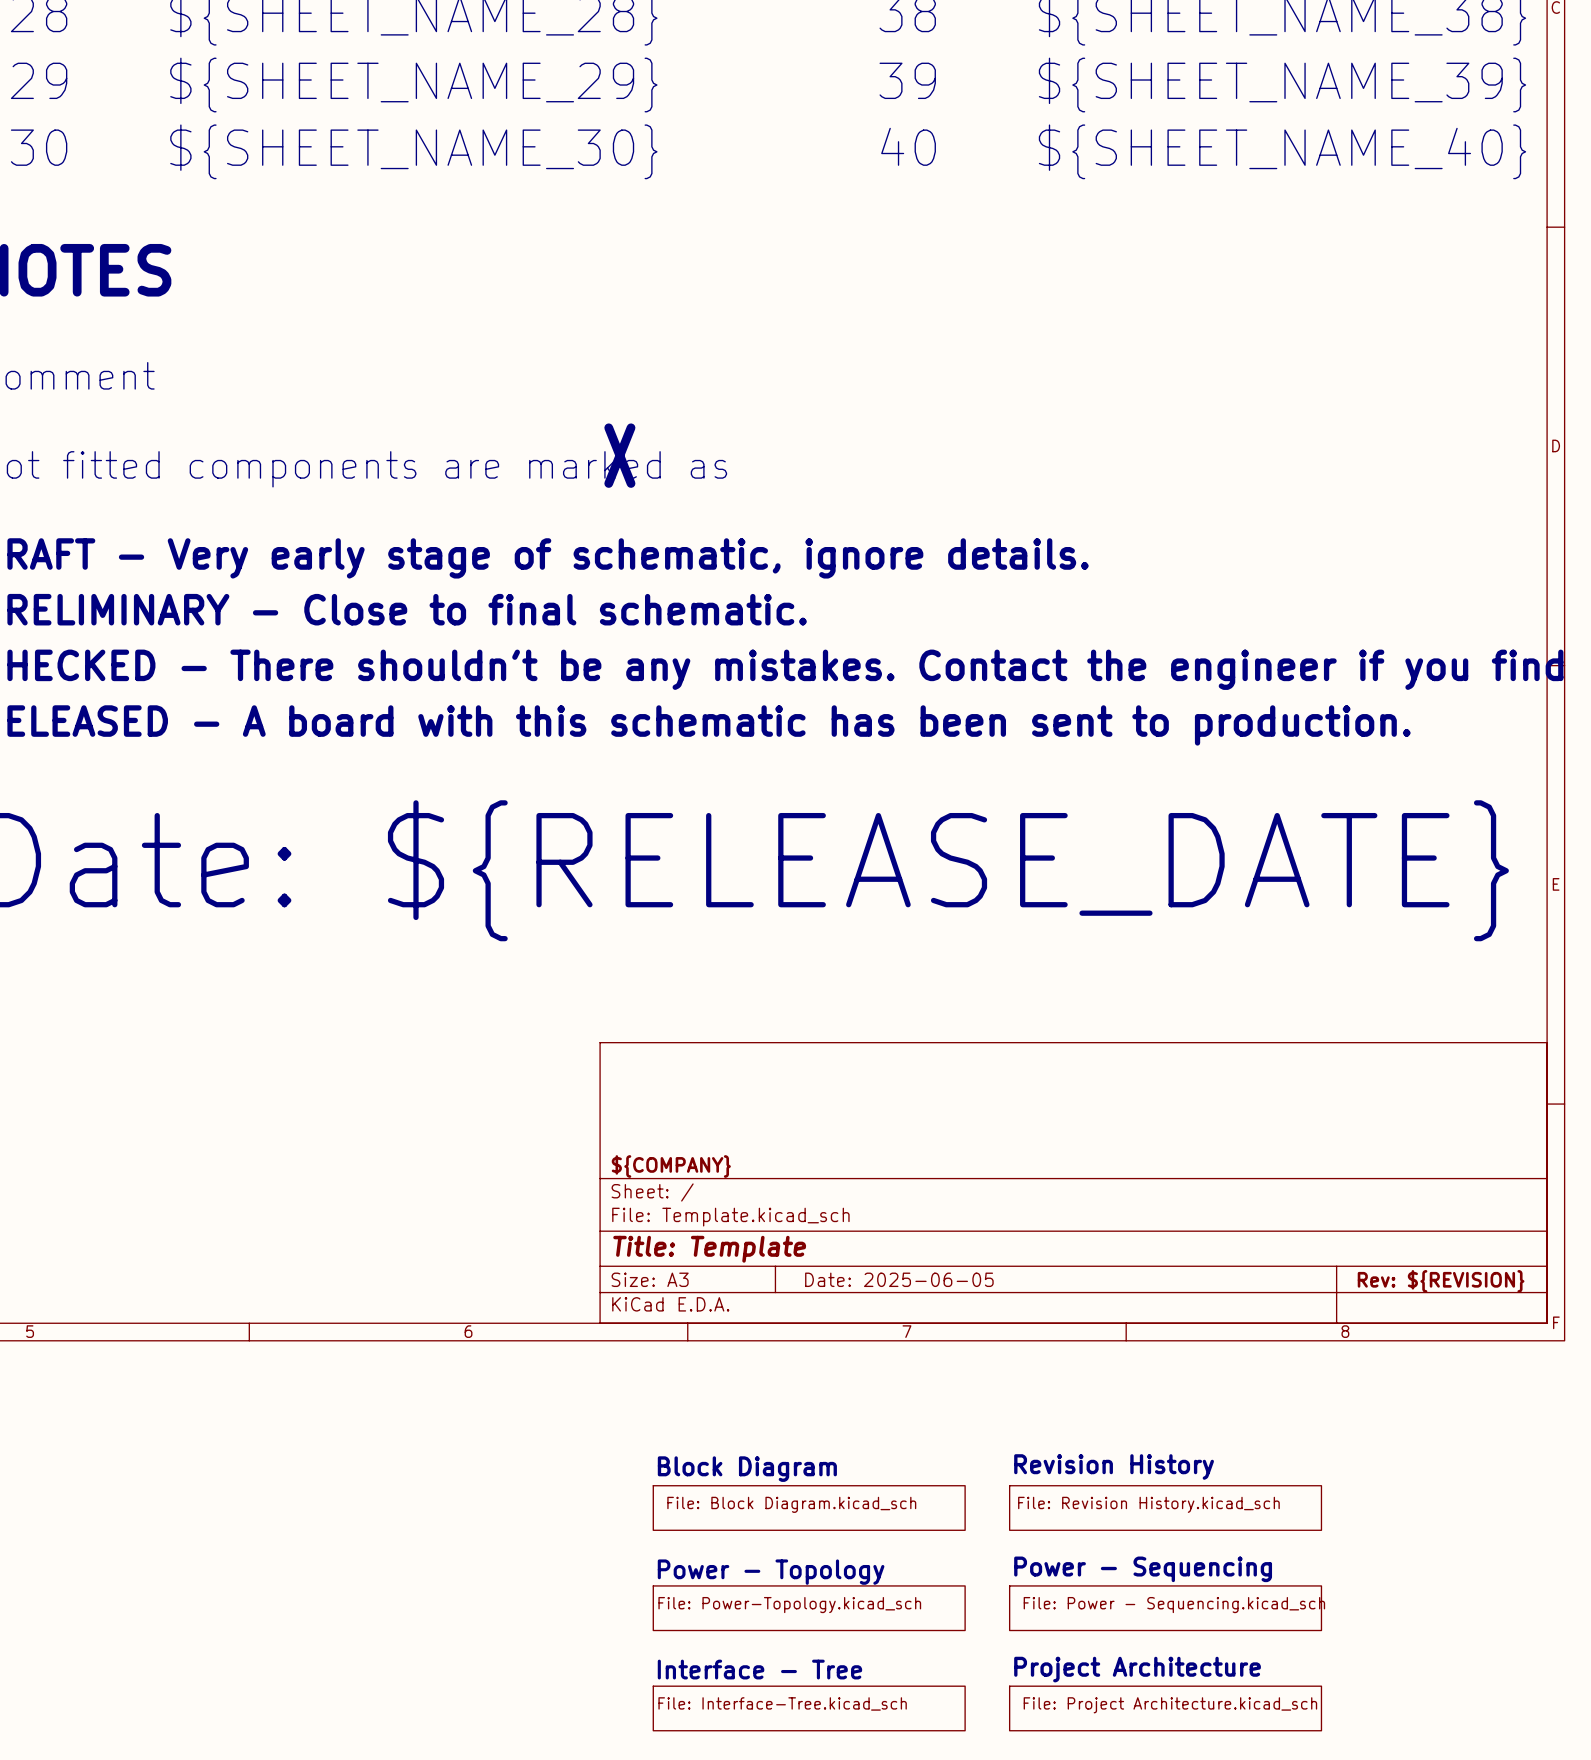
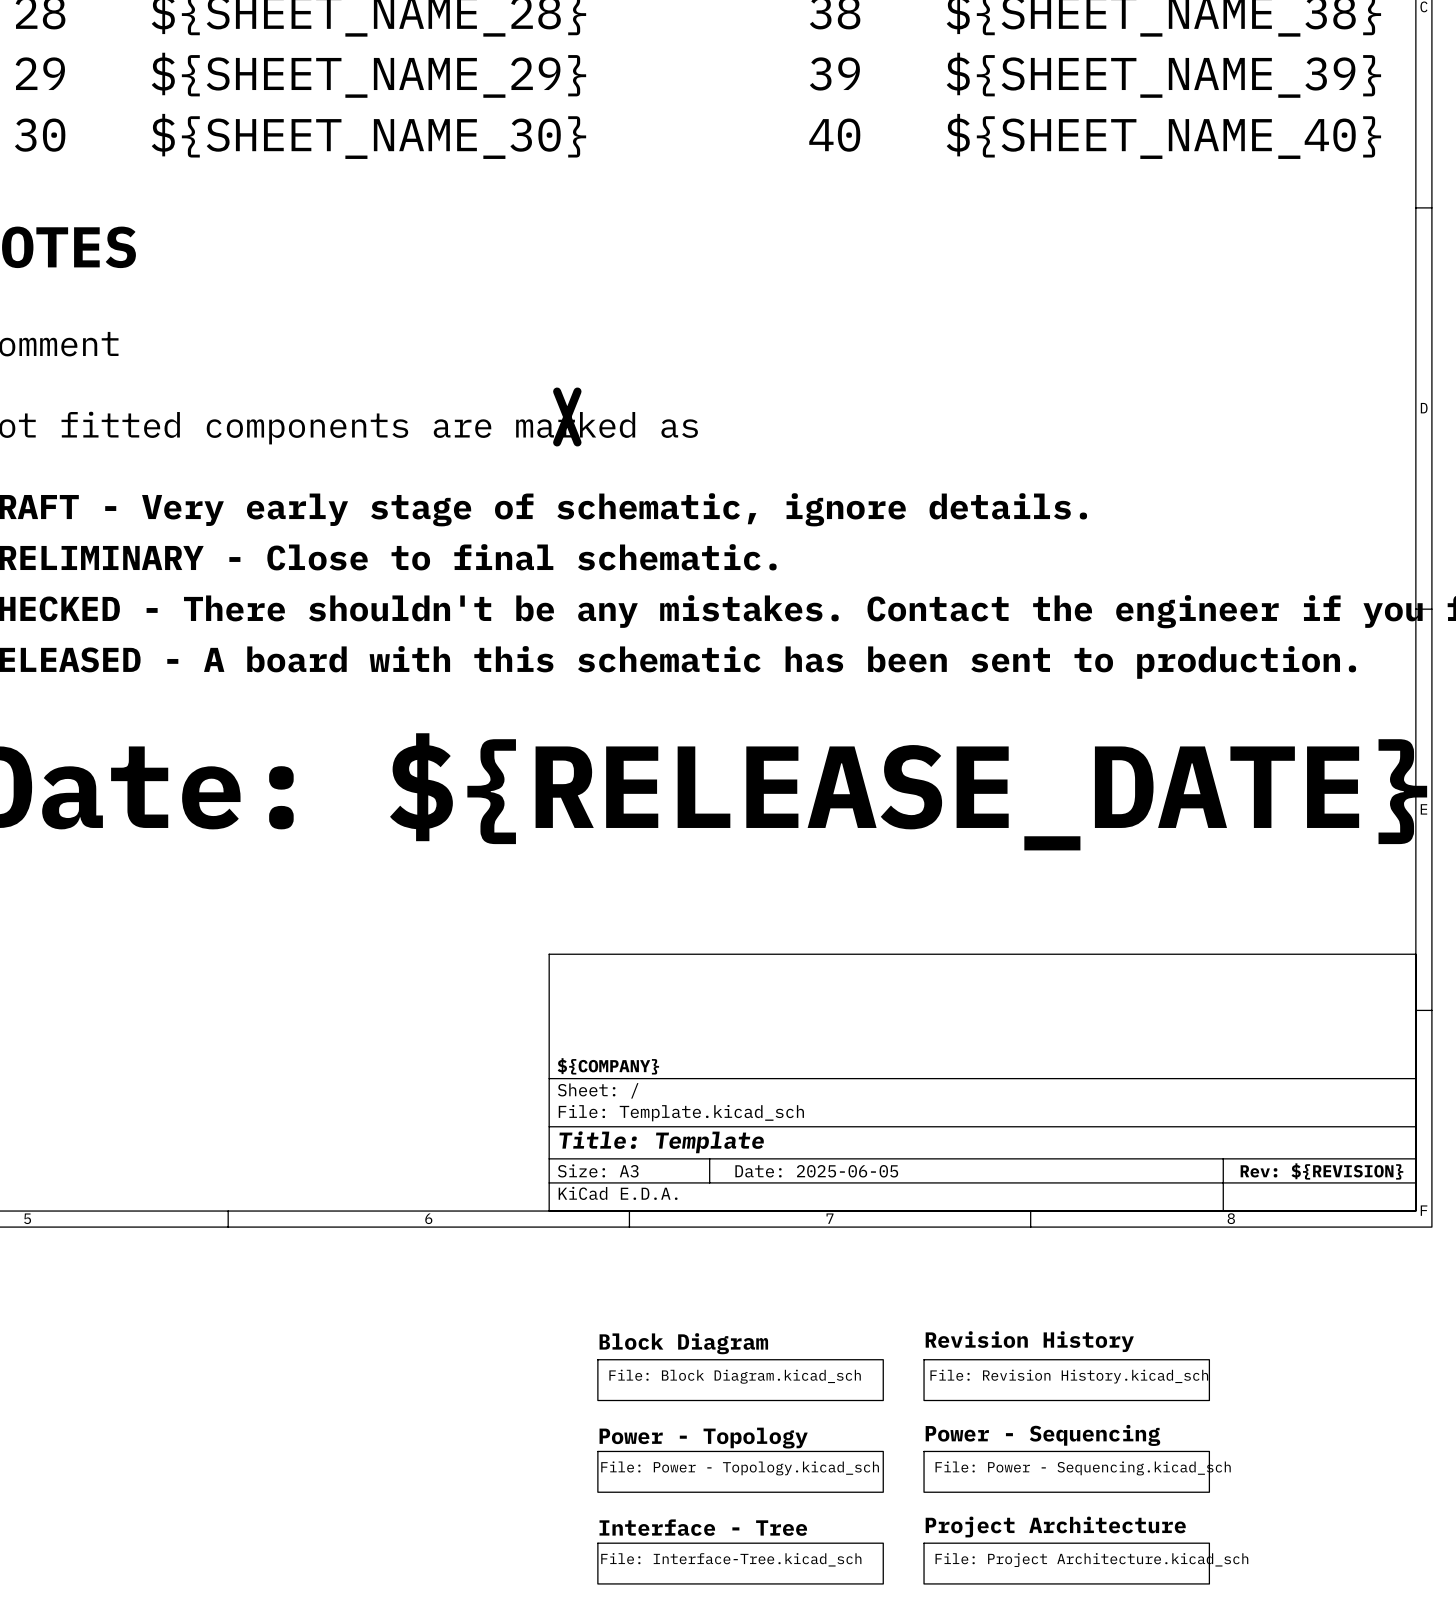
sheet Power - Topology value: File: Power-Topology.kicad_sch (789, 1605) -> File: Power - Topology.kicad_sch (740, 1468)

